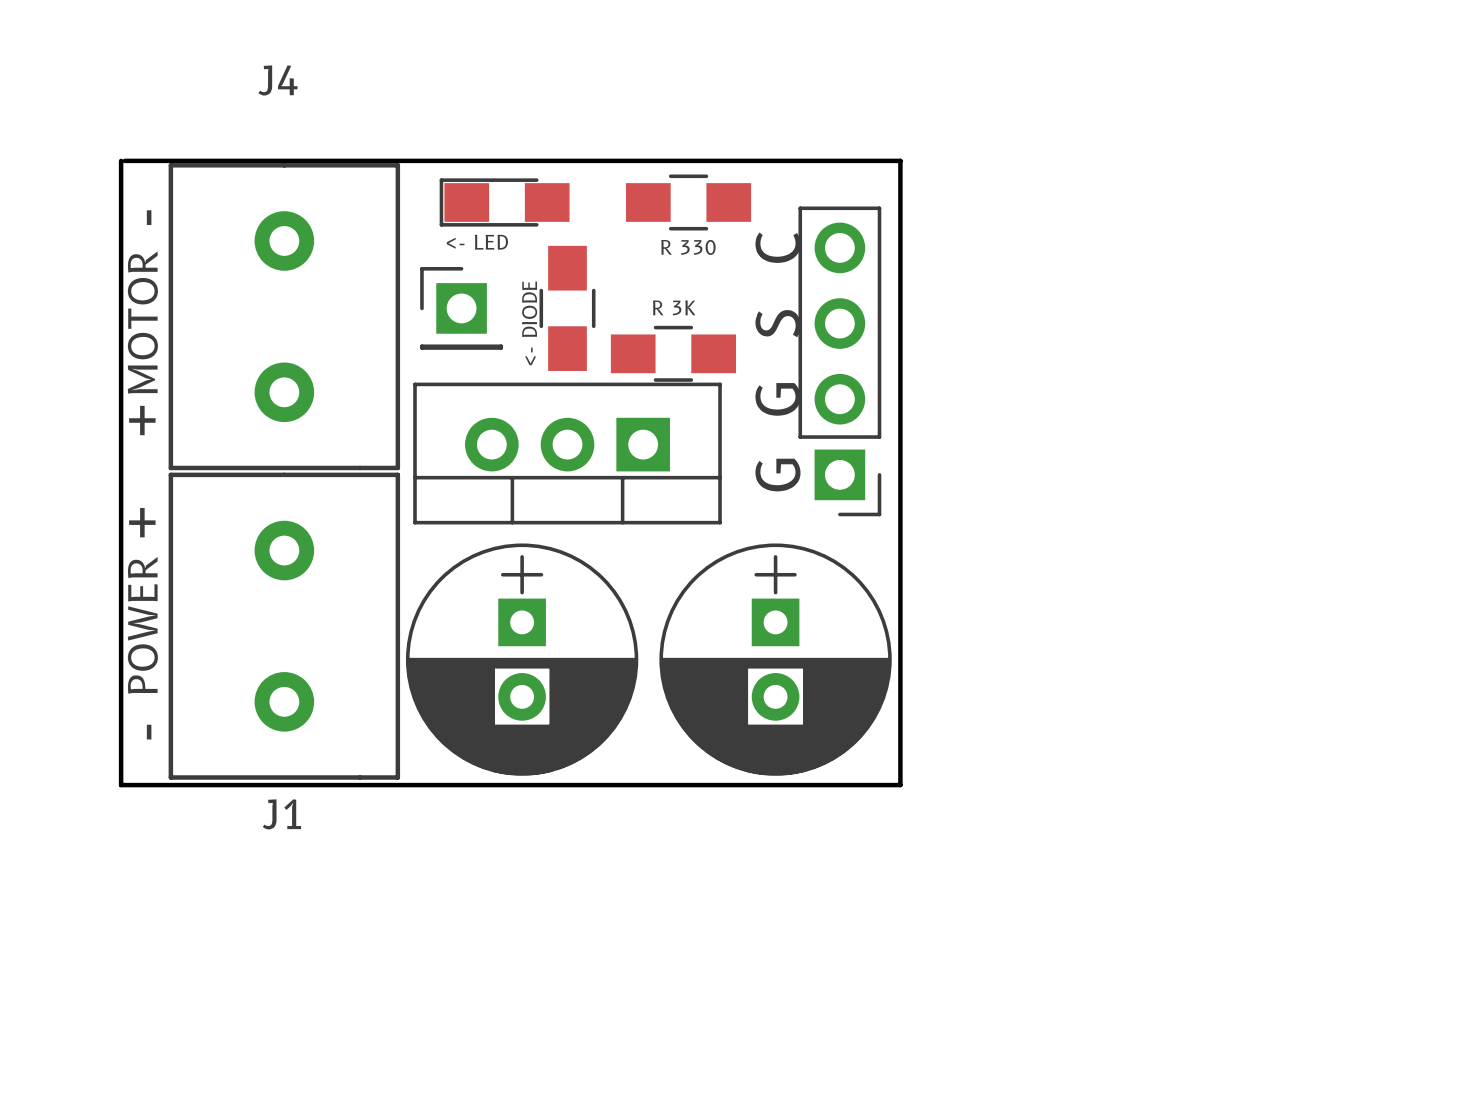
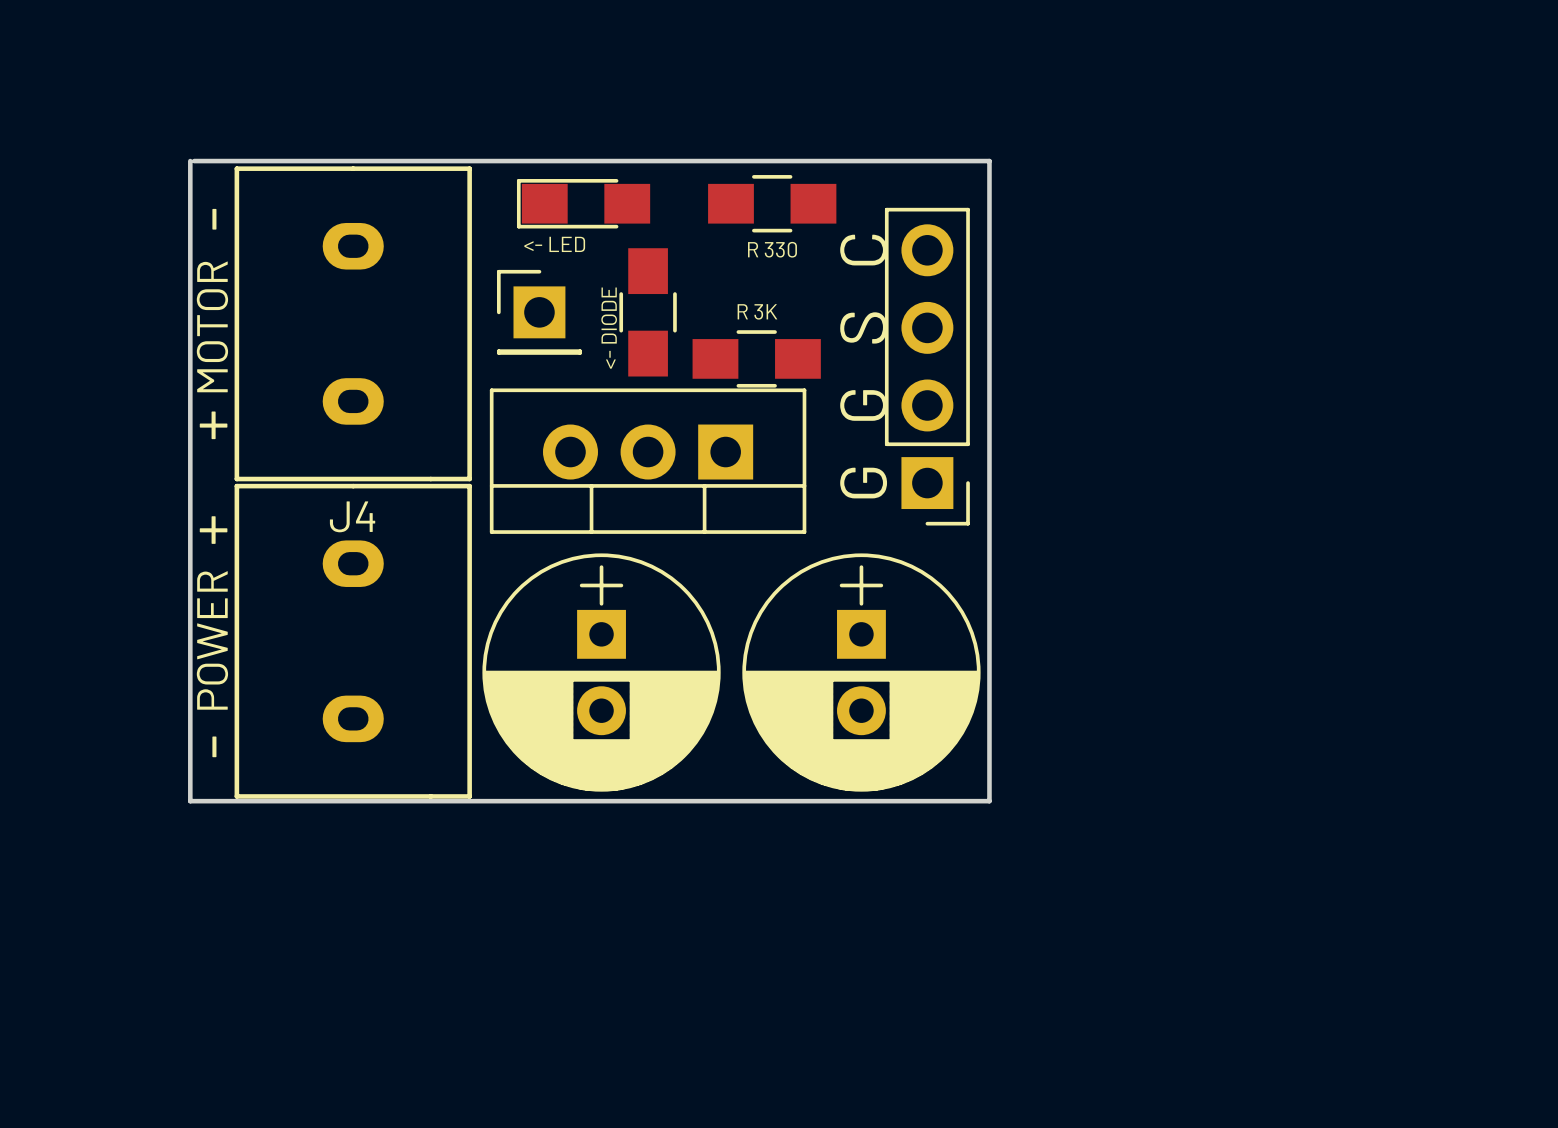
J4 name position: J4 (278, 80) -> J4 (352, 516)
J4 footprint: [168, 163, 401, 471] -> [234, 166, 472, 482]
J1: POWER (284, 626) -> none
part: none -> POWER (353, 641)

